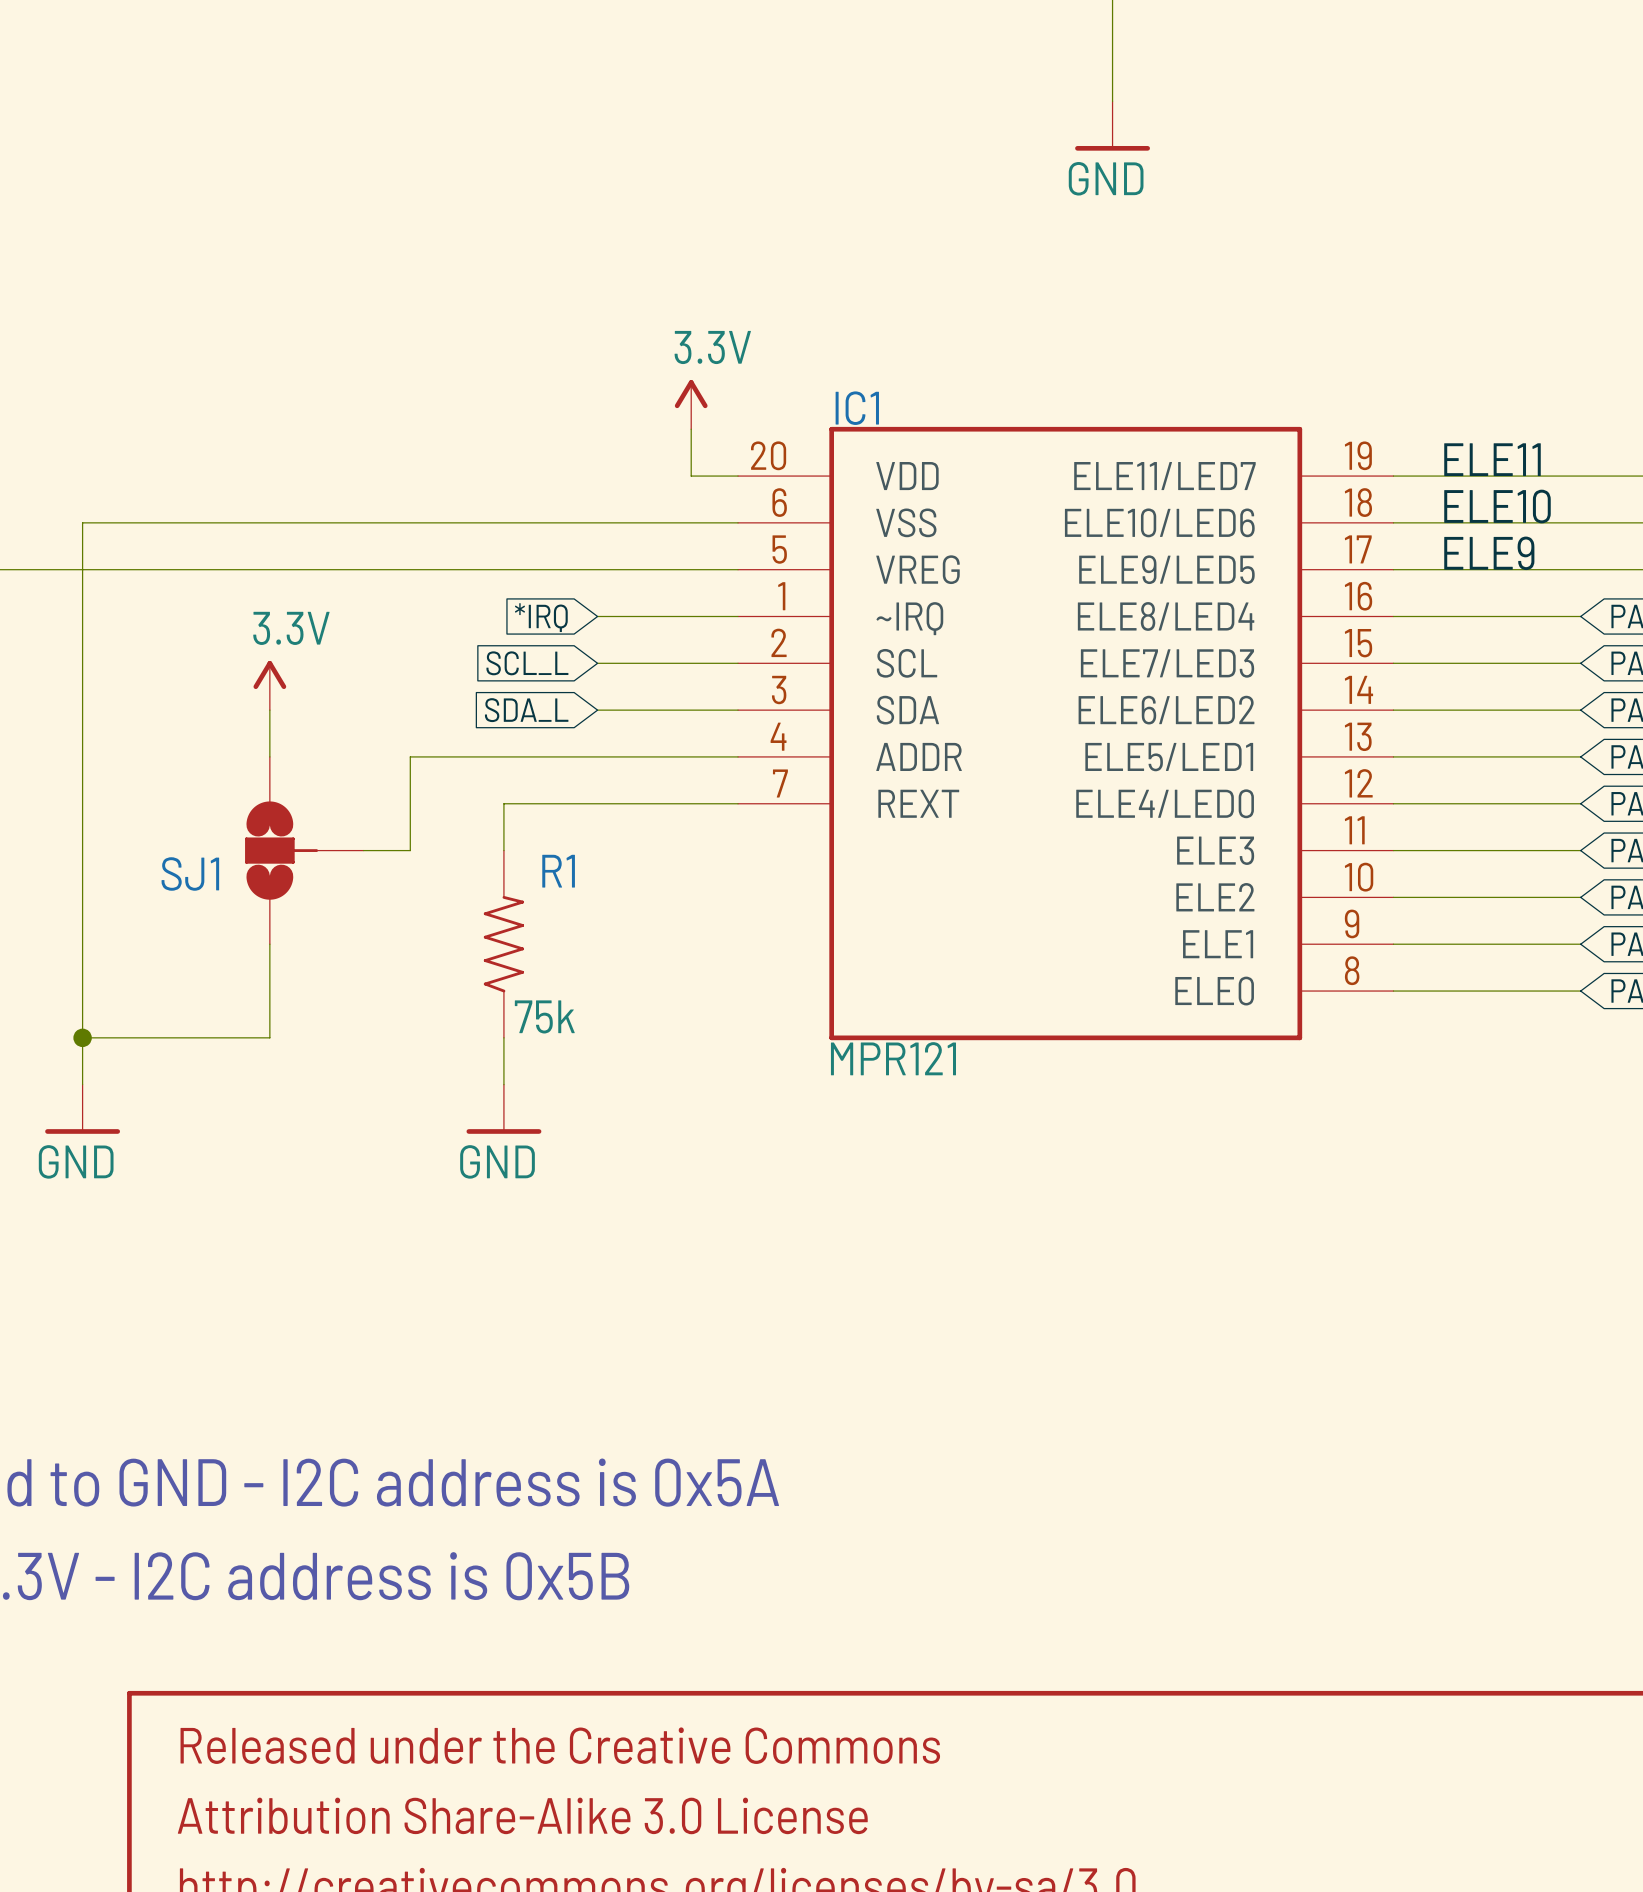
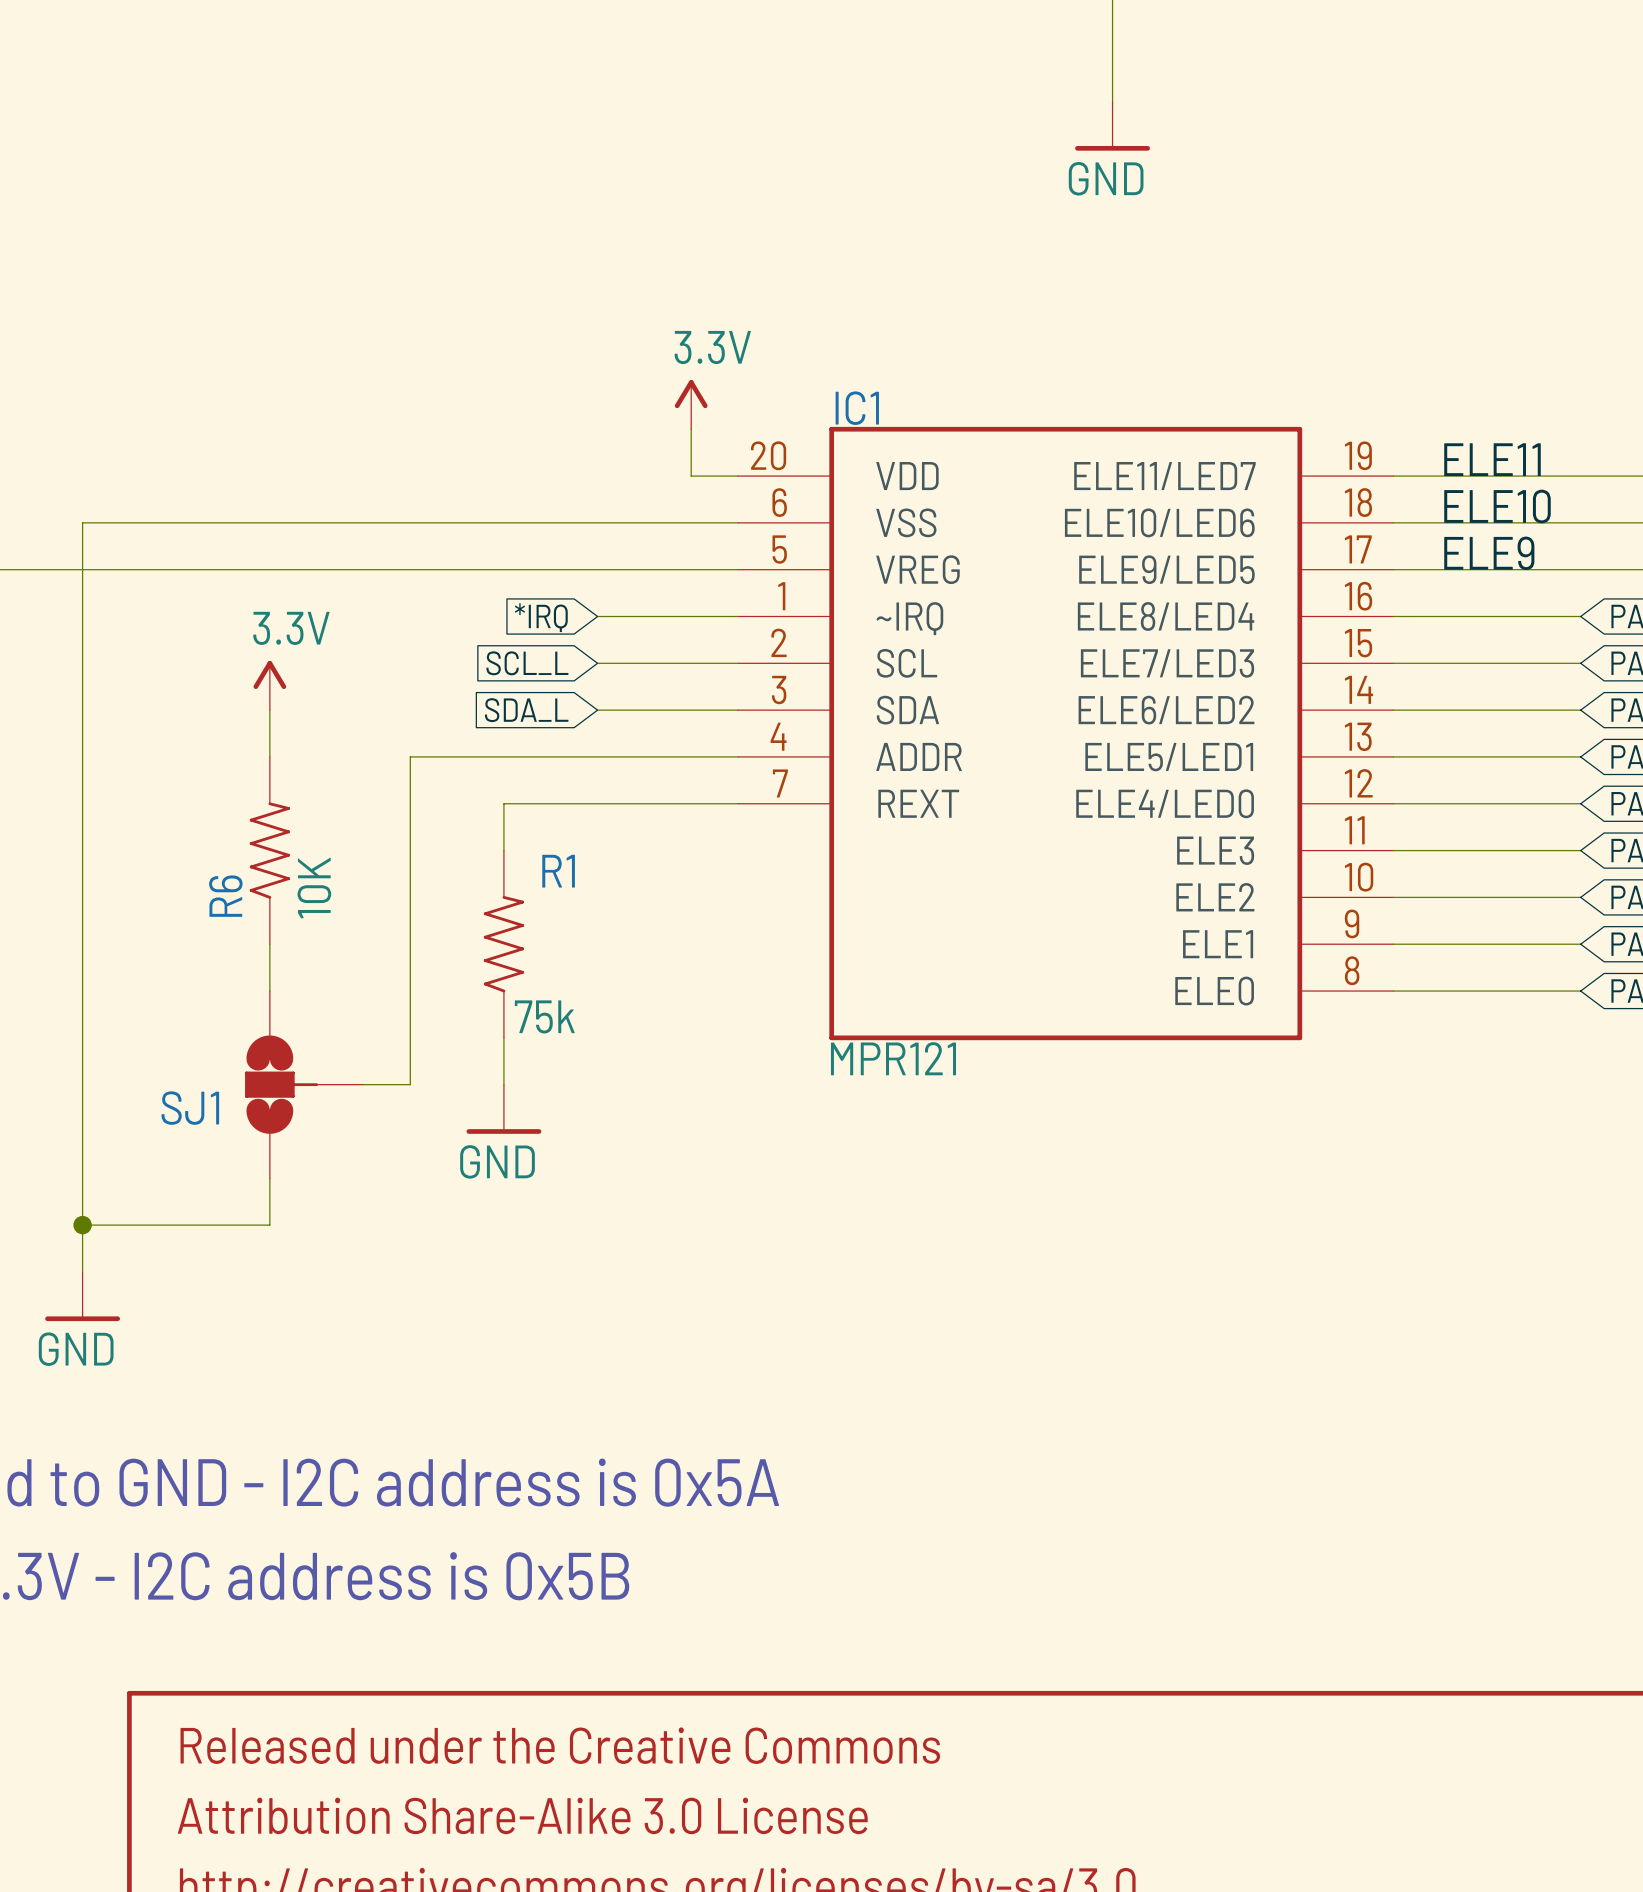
R6: none -> 10K (269, 850)
SJ1 position: (304, 850) -> (304, 1084)
wire: (363, 850) (410, 850) -> (363, 1084) (410, 1084) (410, 850)
wire: (269, 991) (269, 1037) (82, 1037) -> (269, 1178) (269, 1225) (82, 1225)
junction: (82, 1037) -> none
wire: none -> (82, 1084) (82, 1271)
power symbol position: GND (82, 1109) -> GND (82, 1296)
junction: none -> (82, 1225)

